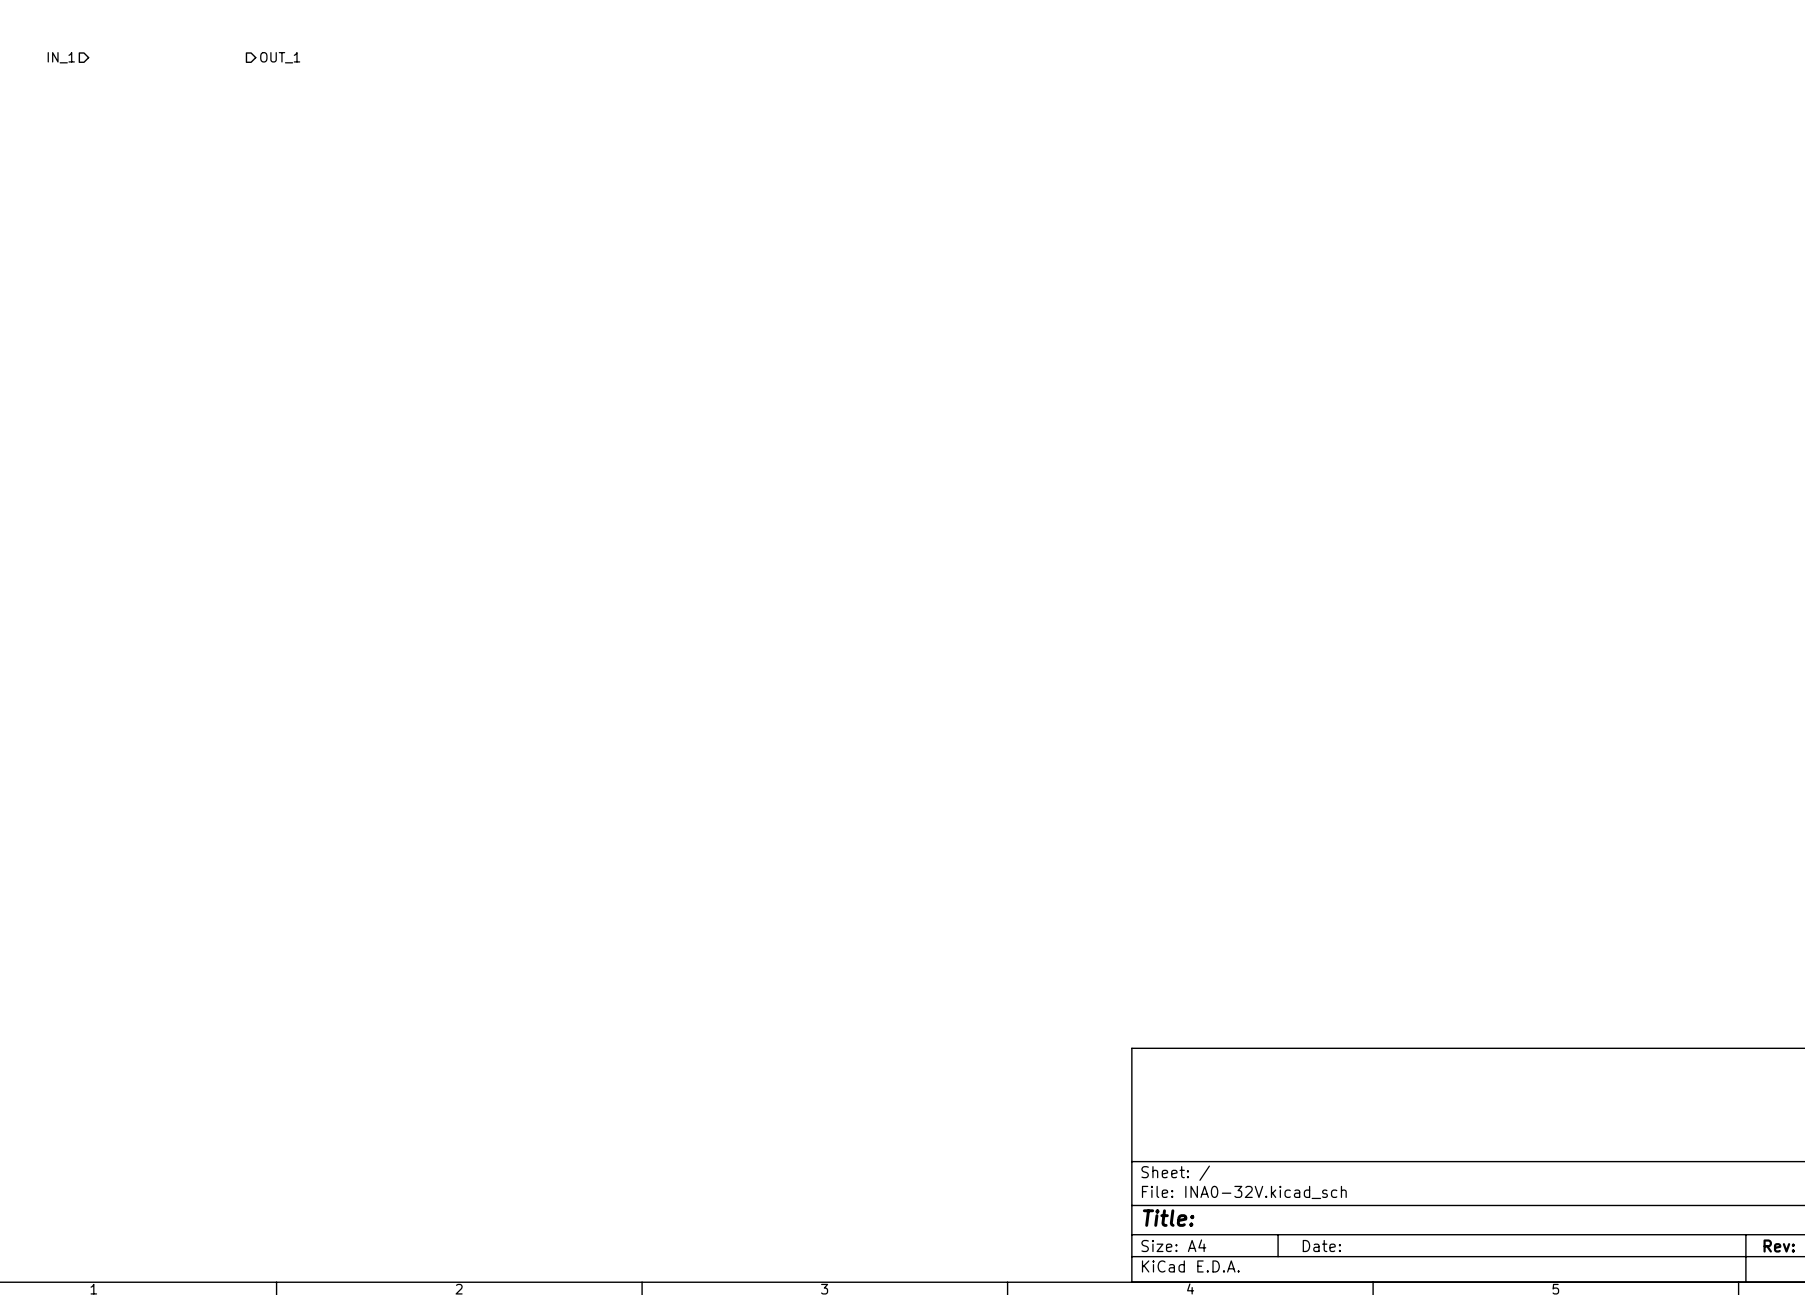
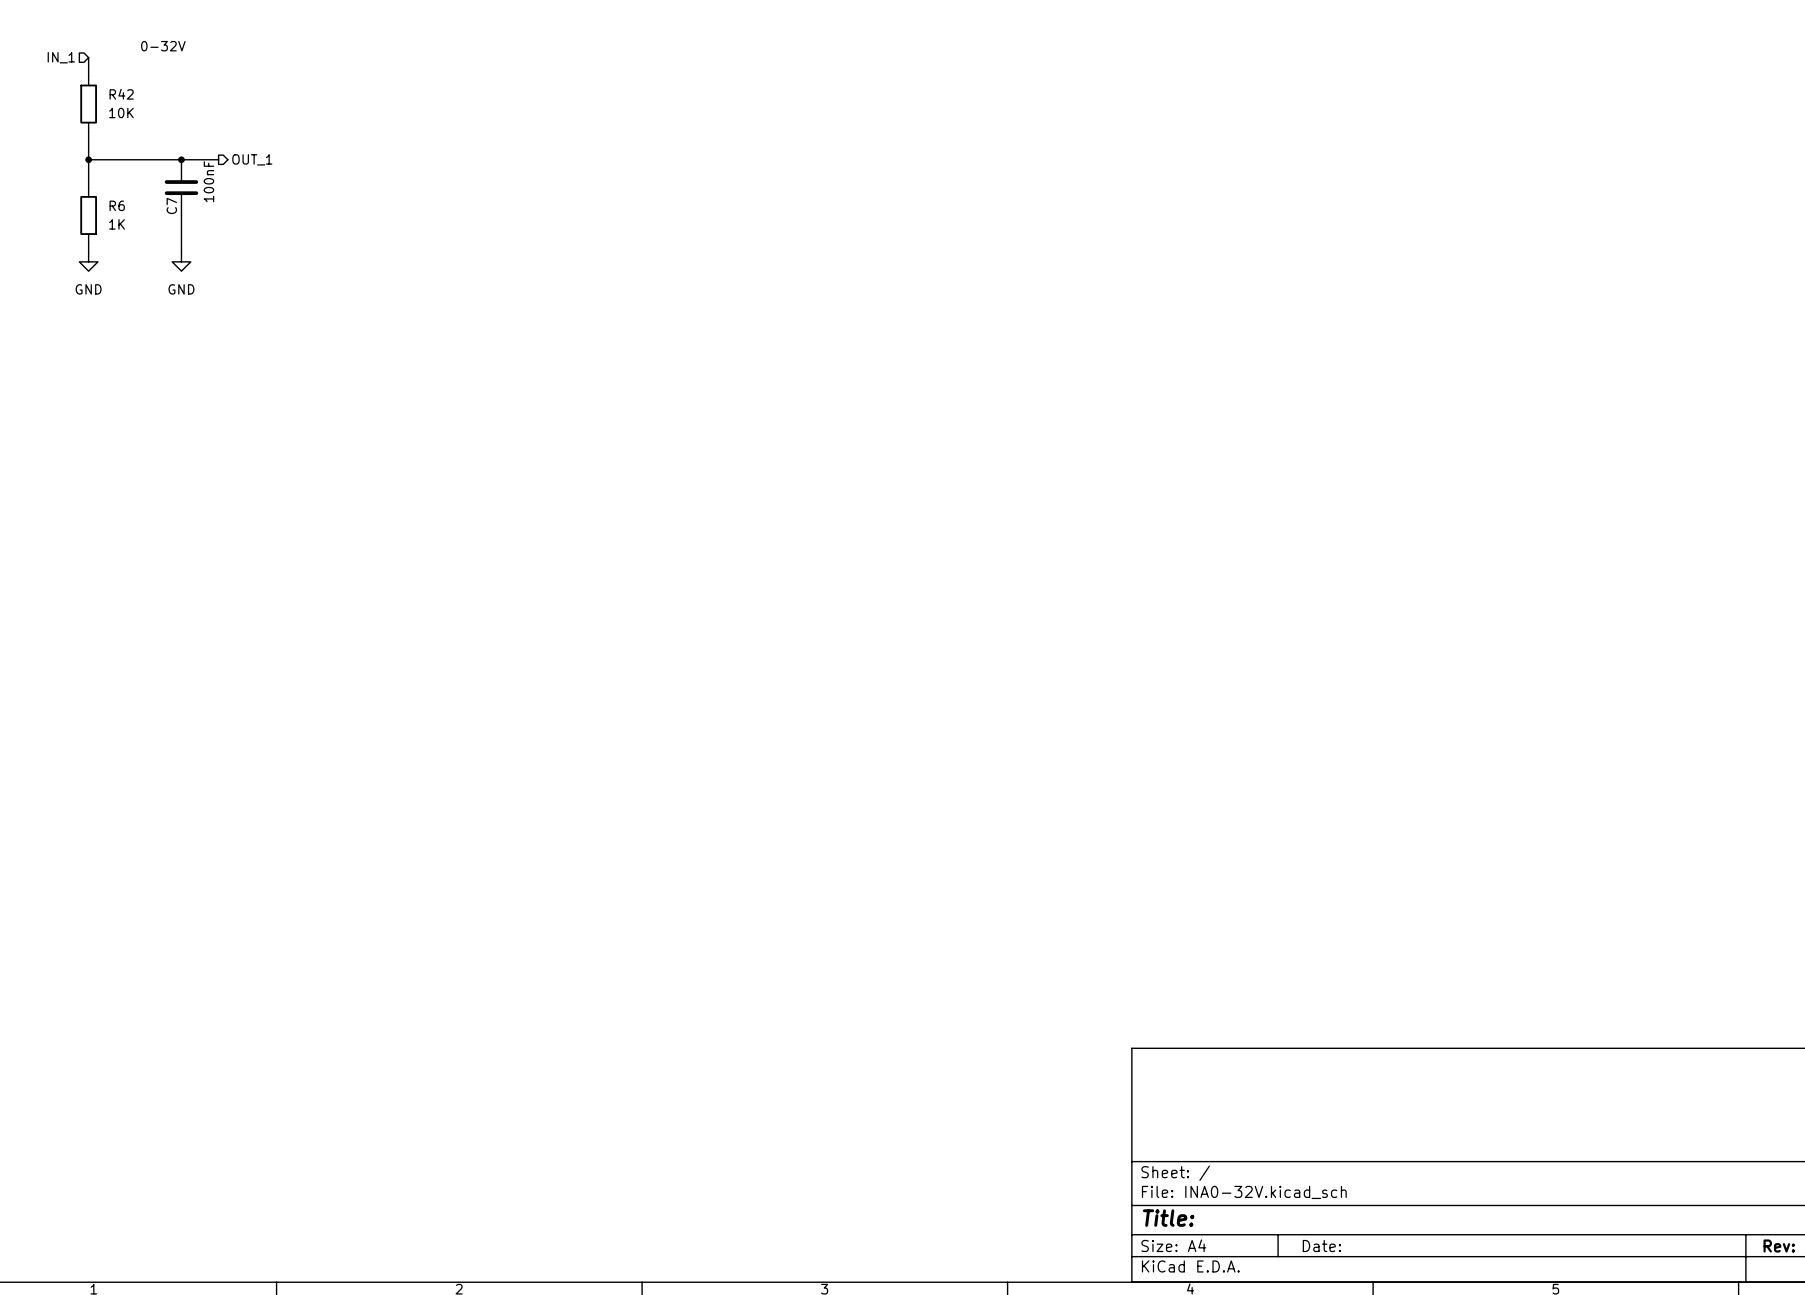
text: none -> 0-32V (163, 46)
wire: none -> (88, 57) (88, 76)
hierarchical label position: OUT_1 (280, 57) -> OUT_1 (252, 159)
R42: none -> 10K (88, 104)
wire: none -> (88, 131) (88, 187)
wire: none -> (88, 159) (218, 159)
junction: none -> (88, 159)
junction: none -> (181, 159)
C7: none -> 100nF (181, 187)
R6: none -> 1K (88, 215)
wire: none -> (181, 215) (181, 252)
wire: none -> (88, 243) (88, 252)
power symbol: none -> GND (88, 261)
power symbol: none -> GND (181, 261)

